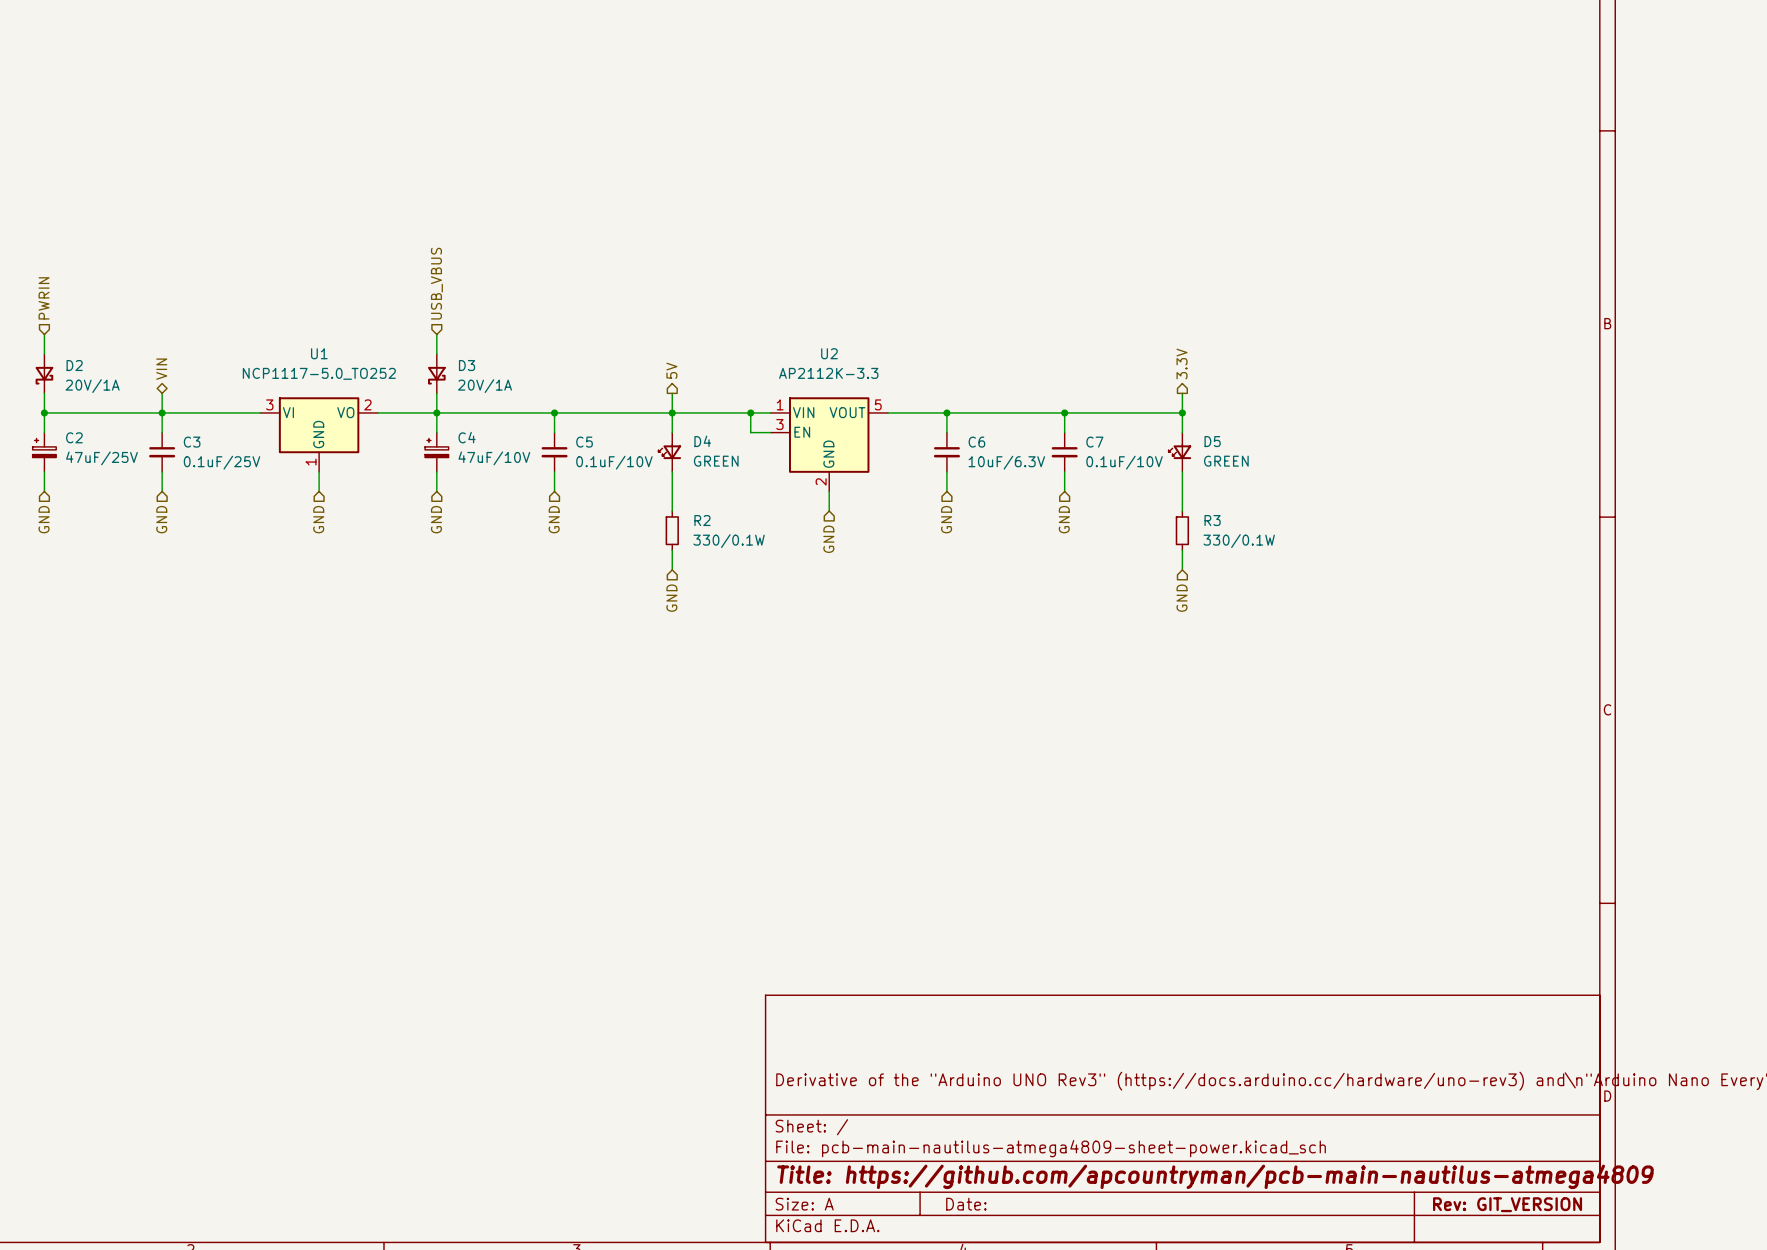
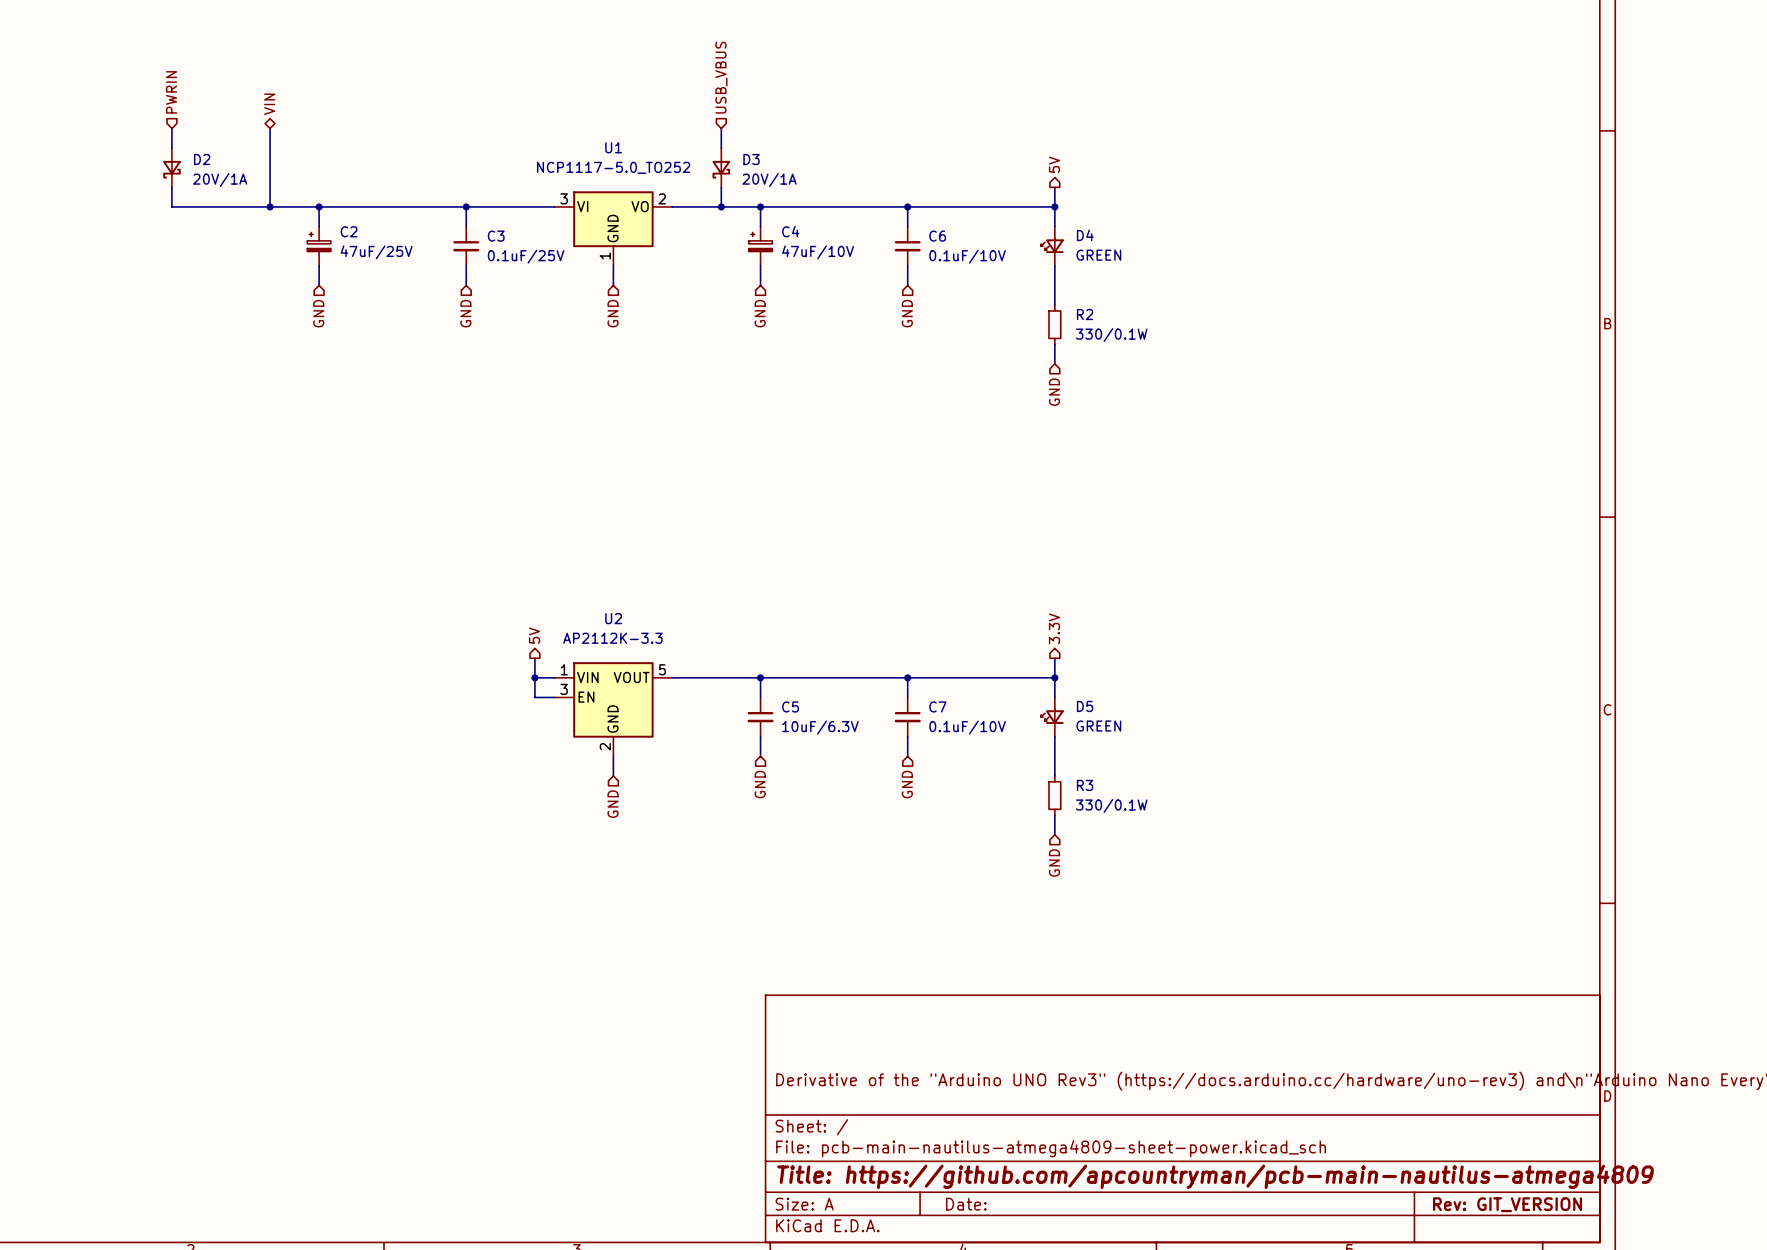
hierarchical label: none -> USB_VBUS (721, 77)
hierarchical label: none -> PWRIN (171, 92)
hierarchical label: none -> VIN (269, 104)
wire: none -> (171, 128) (171, 148)
wire: none -> (270, 128) (270, 206)
wire: none -> (721, 128) (721, 148)
hierarchical label: none -> 5V (1054, 164)
wire: none -> (171, 187) (171, 206) (554, 206)
wire: none -> (721, 187) (721, 206)
wire: none -> (1054, 187) (1054, 226)
junction: none -> (270, 206)
wire: none -> (319, 206) (319, 226)
junction: none -> (319, 206)
wire: none -> (466, 206) (466, 226)
junction: none -> (466, 206)
wire: none -> (672, 206) (1054, 206)
junction: none -> (721, 206)
wire: none -> (760, 206) (760, 226)
junction: none -> (760, 206)
wire: none -> (907, 206) (907, 226)
junction: none -> (907, 206)
junction: none -> (1054, 206)
wire: none -> (319, 265) (319, 285)
wire: none -> (760, 265) (760, 285)
hierarchical label: USB_VBUS (436, 283) -> none
hierarchical label: PWRIN (44, 298) -> none
hierarchical label: none -> GND (318, 313)
hierarchical label: none -> GND (465, 313)
hierarchical label: none -> GND (613, 313)
hierarchical label: none -> GND (760, 313)
hierarchical label: none -> GND (907, 313)
wire: (44, 334) (44, 354) -> none
wire: (436, 334) (436, 354) -> (466, 265) (466, 285)
hierarchical label: 3.3V (1182, 364) -> none
hierarchical label: VIN (161, 369) -> none
hierarchical label: 5V (671, 370) -> none
D2 position: (44, 373) -> (171, 167)
D3 position: (436, 373) -> (721, 167)
hierarchical label: none -> GND (1054, 392)
wire: (44, 393) (44, 432) -> none
wire: (162, 393) (162, 432) -> none
wire: (436, 393) (436, 432) -> none
wire: (672, 393) (672, 432) -> none
wire: (1182, 393) (1182, 432) -> (1054, 265) (1054, 305)
wire: (44, 412) (260, 412) -> none
junction: (44, 412) -> none
junction: (162, 412) -> none
wire: (377, 412) (770, 412) -> none
junction: (436, 412) -> none
wire: (554, 412) (554, 432) -> (613, 265) (613, 285)
junction: (554, 412) -> none
junction: (672, 412) -> none
wire: (750, 412) (750, 432) (770, 432) -> none
junction: (750, 412) -> none
wire: (888, 412) (1182, 412) -> none
wire: (946, 412) (946, 432) -> (907, 265) (907, 285)
junction: (946, 412) -> none
wire: (1064, 412) (1064, 432) -> (1054, 344) (1054, 363)
junction: (1064, 412) -> none
junction: (1182, 412) -> none
U1 position: (319, 434) -> (613, 228)
U2 position: (829, 444) -> (613, 709)
C2 position: (44, 452) -> (319, 246)
C3 position: (162, 452) -> (466, 246)
C4 position: (436, 452) -> (760, 246)
C5 position: (554, 452) -> (760, 717)
D4 position: (669, 452) -> (1052, 246)
C6 position: (946, 452) -> (907, 246)
C7 position: (1064, 452) -> (907, 717)
D5 position: (1179, 452) -> (1052, 717)
C5 value: 0.1uF/10V (614, 462) -> 10uF/6.3V (820, 727)
C6 value: 10uF/6.3V (1006, 462) -> 0.1uF/10V (967, 256)
wire: (44, 471) (44, 491) -> none
wire: (162, 471) (162, 491) -> none
wire: (319, 471) (319, 491) -> none
wire: (436, 471) (436, 491) -> none
wire: (554, 471) (554, 491) -> none
wire: (672, 471) (672, 511) -> none
wire: (946, 471) (946, 491) -> none
wire: (1064, 471) (1064, 491) -> none
wire: (1182, 471) (1182, 511) -> none
wire: (829, 491) (829, 511) -> none
hierarchical label: GND (44, 519) -> none
hierarchical label: GND (161, 519) -> none
hierarchical label: GND (318, 519) -> none
hierarchical label: GND (436, 519) -> none
hierarchical label: GND (554, 519) -> none
hierarchical label: GND (946, 519) -> none
hierarchical label: GND (1064, 519) -> none
R2 position: (672, 530) -> (1054, 324)
R3 position: (1182, 530) -> (1054, 795)
hierarchical label: GND (828, 539) -> none
wire: (672, 550) (672, 569) -> (760, 677) (760, 697)
wire: (1182, 550) (1182, 569) -> none
hierarchical label: GND (671, 598) -> none
hierarchical label: GND (1182, 598) -> none
hierarchical label: none -> 3.3V (1054, 628)
hierarchical label: none -> 5V (534, 635)
wire: none -> (534, 658) (534, 697) (554, 697)
wire: none -> (1054, 658) (1054, 697)
wire: none -> (534, 677) (554, 677)
junction: none -> (534, 677)
wire: none -> (672, 677) (1054, 677)
junction: none -> (760, 677)
wire: none -> (907, 677) (907, 697)
junction: none -> (907, 677)
junction: none -> (1054, 677)
wire: none -> (760, 736) (760, 756)
wire: none -> (907, 736) (907, 756)
wire: none -> (1054, 736) (1054, 775)
wire: none -> (613, 756) (613, 775)
hierarchical label: none -> GND (760, 784)
hierarchical label: none -> GND (907, 784)
hierarchical label: none -> GND (613, 804)
wire: none -> (1054, 815) (1054, 834)
hierarchical label: none -> GND (1054, 862)

